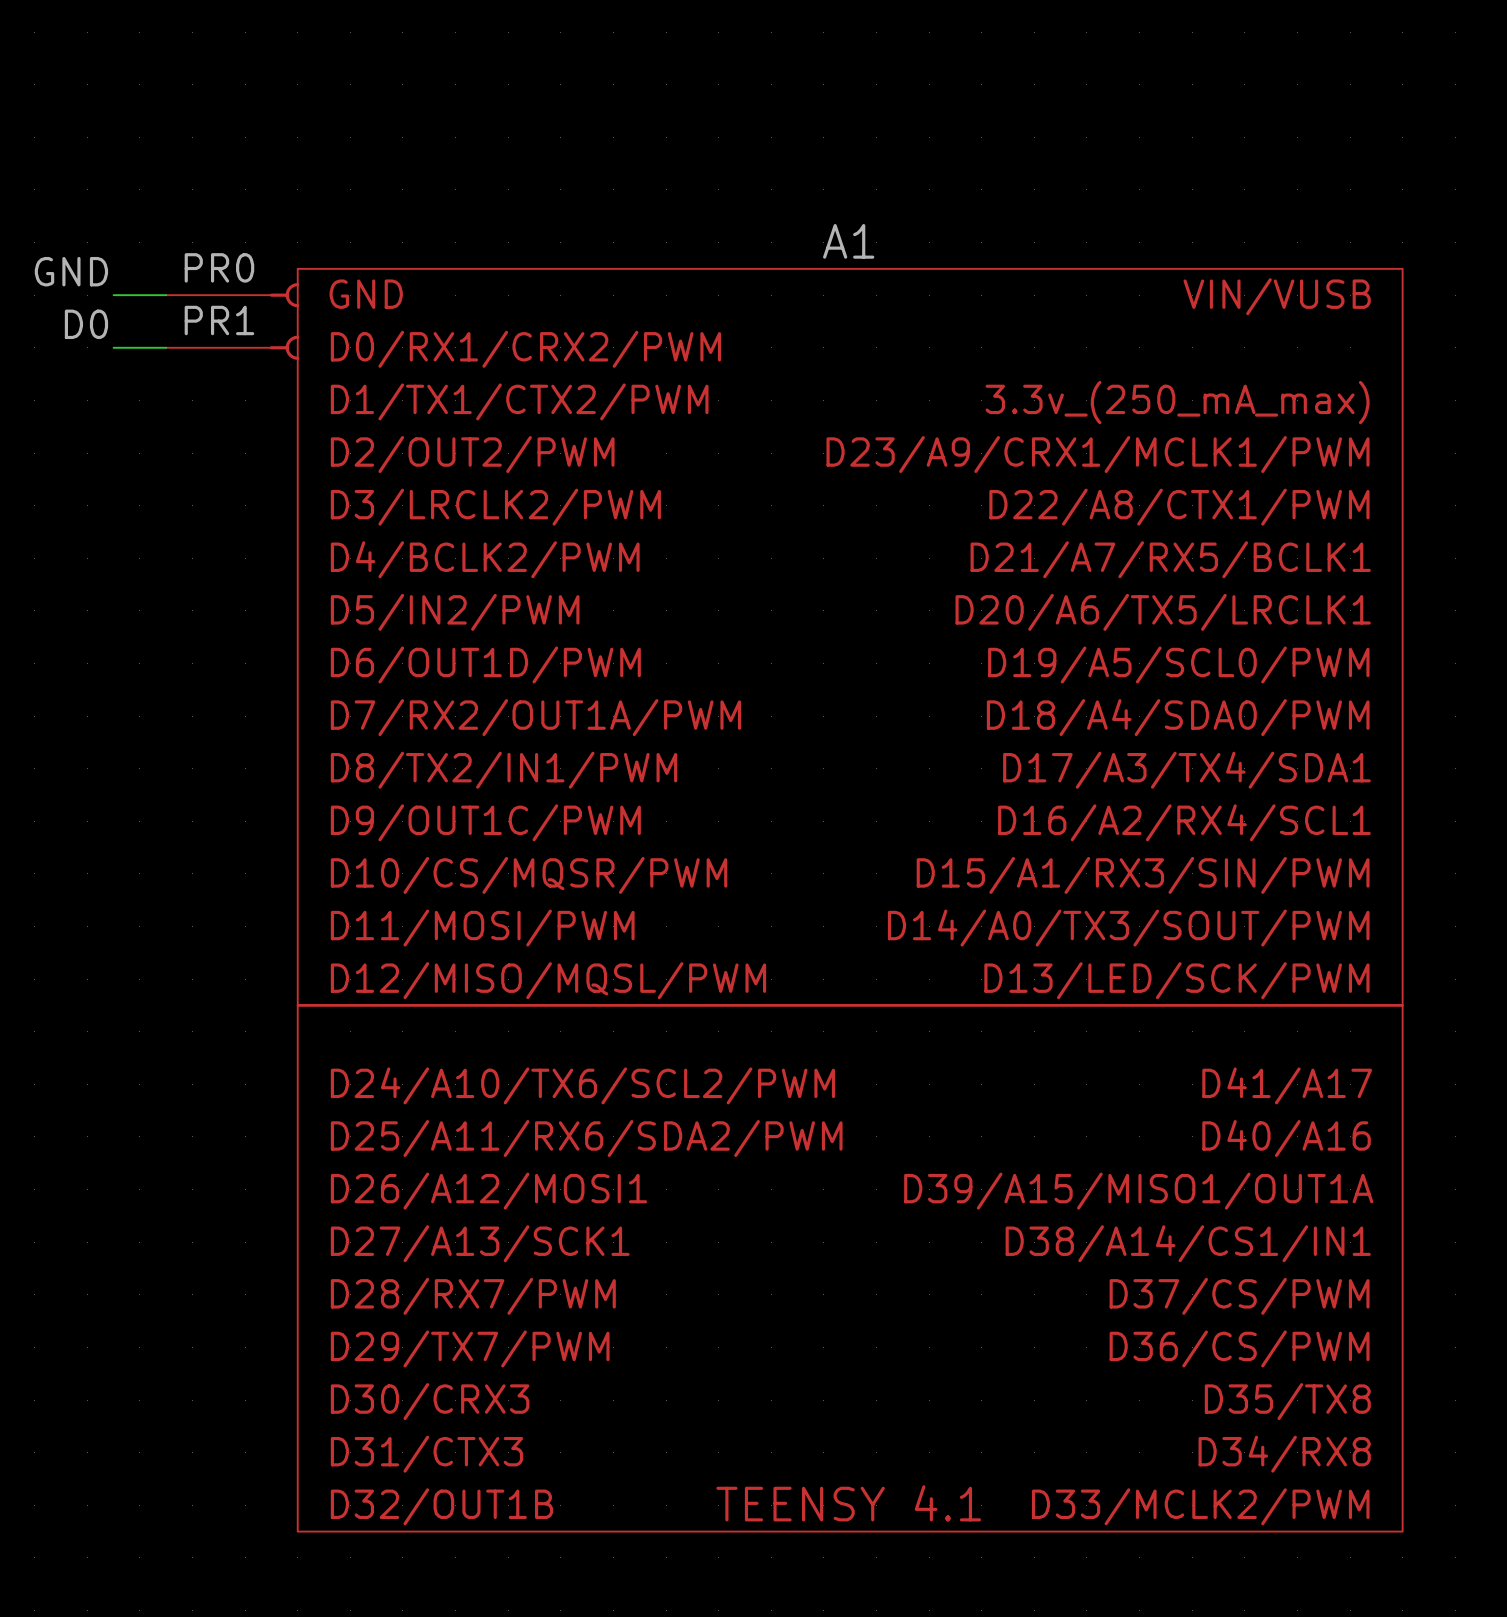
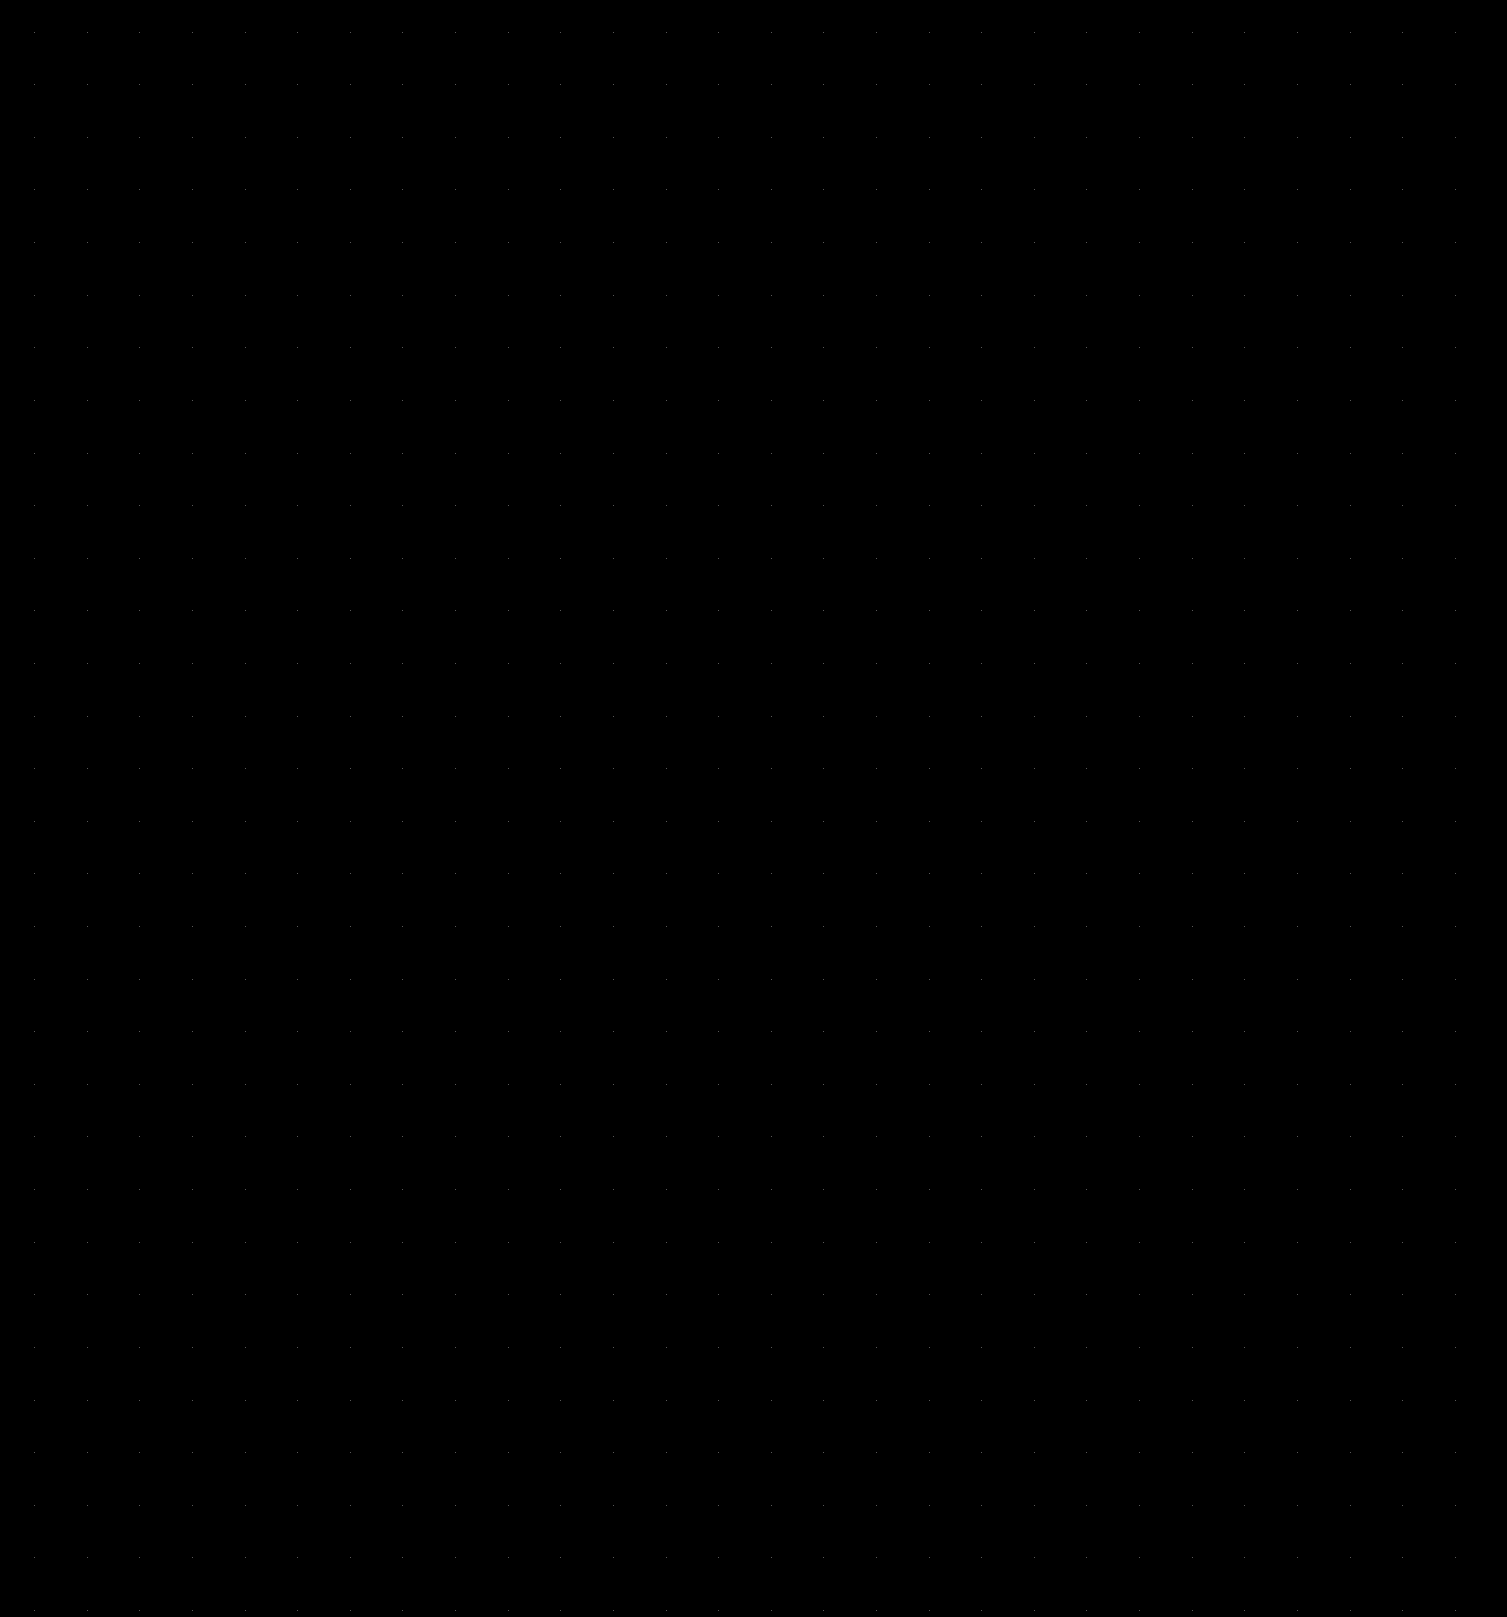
label: GND (71, 271) -> none
wire: (113, 295) (166, 295) -> none
PR0: (232, 295) -> none
label: D0 (86, 324) -> none
wire: (113, 347) (166, 347) -> none
PR1: (232, 347) -> none
A1: (850, 900) -> none

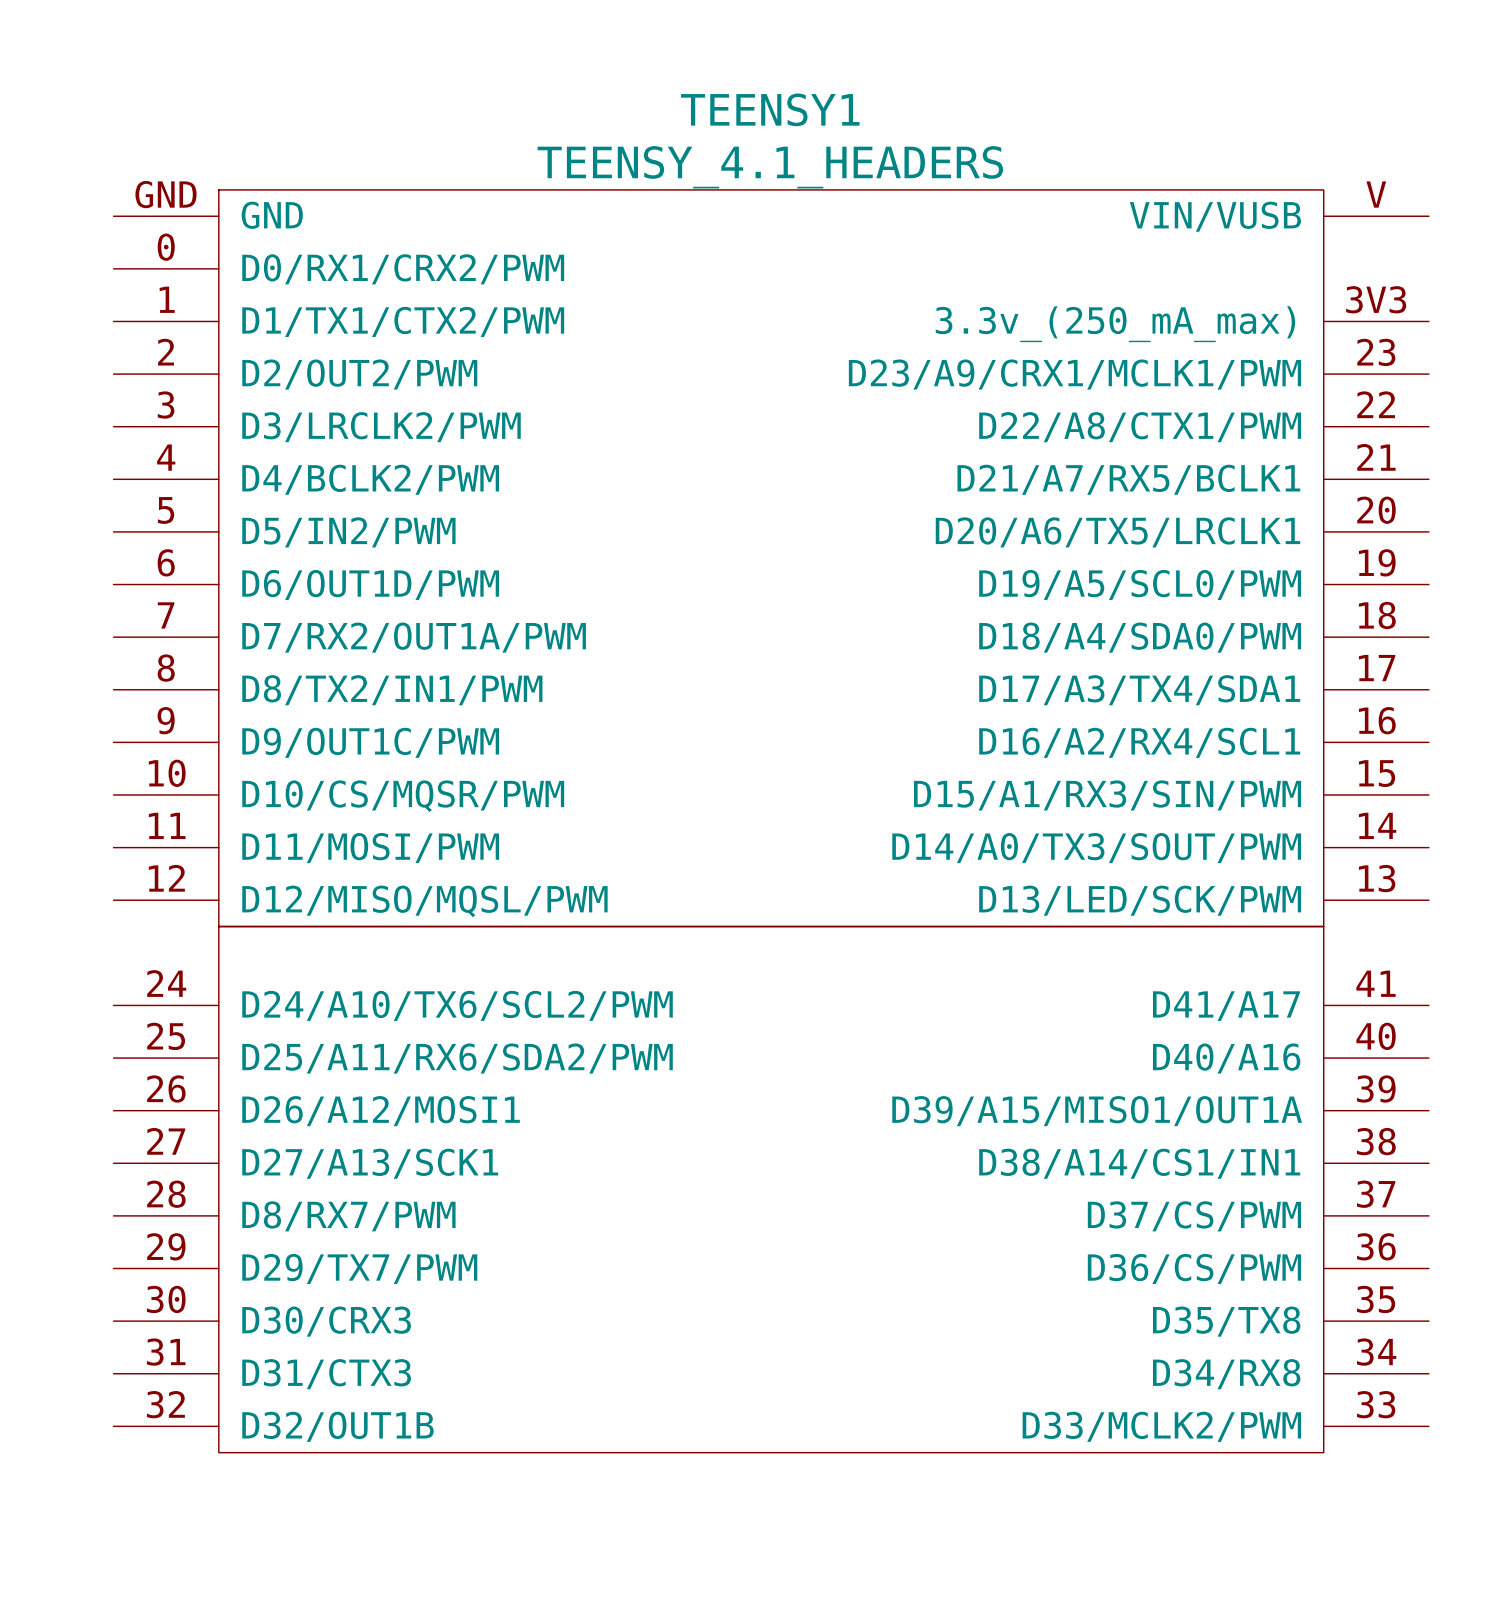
TEENSY1: none -> TEENSY_4.1_HEADERS (771, 821)

